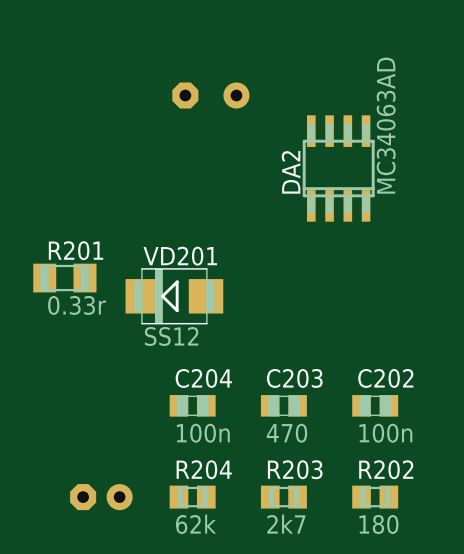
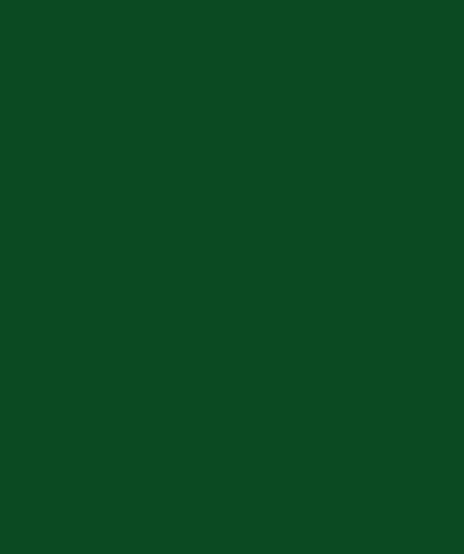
part: (210, 95) -> none
DA2: MC34063AD (338, 168) -> none
R201: 0.33r (64, 278) -> none
VD201: SS12 (174, 296) -> none
C204: 100n (192, 405) -> none
C203: 470 (283, 405) -> none
C202: 100n (375, 405) -> none
part: (101, 497) -> none
R204: 62k (192, 497) -> none
R203: 2k7 (283, 497) -> none
R202: 180 (375, 497) -> none

